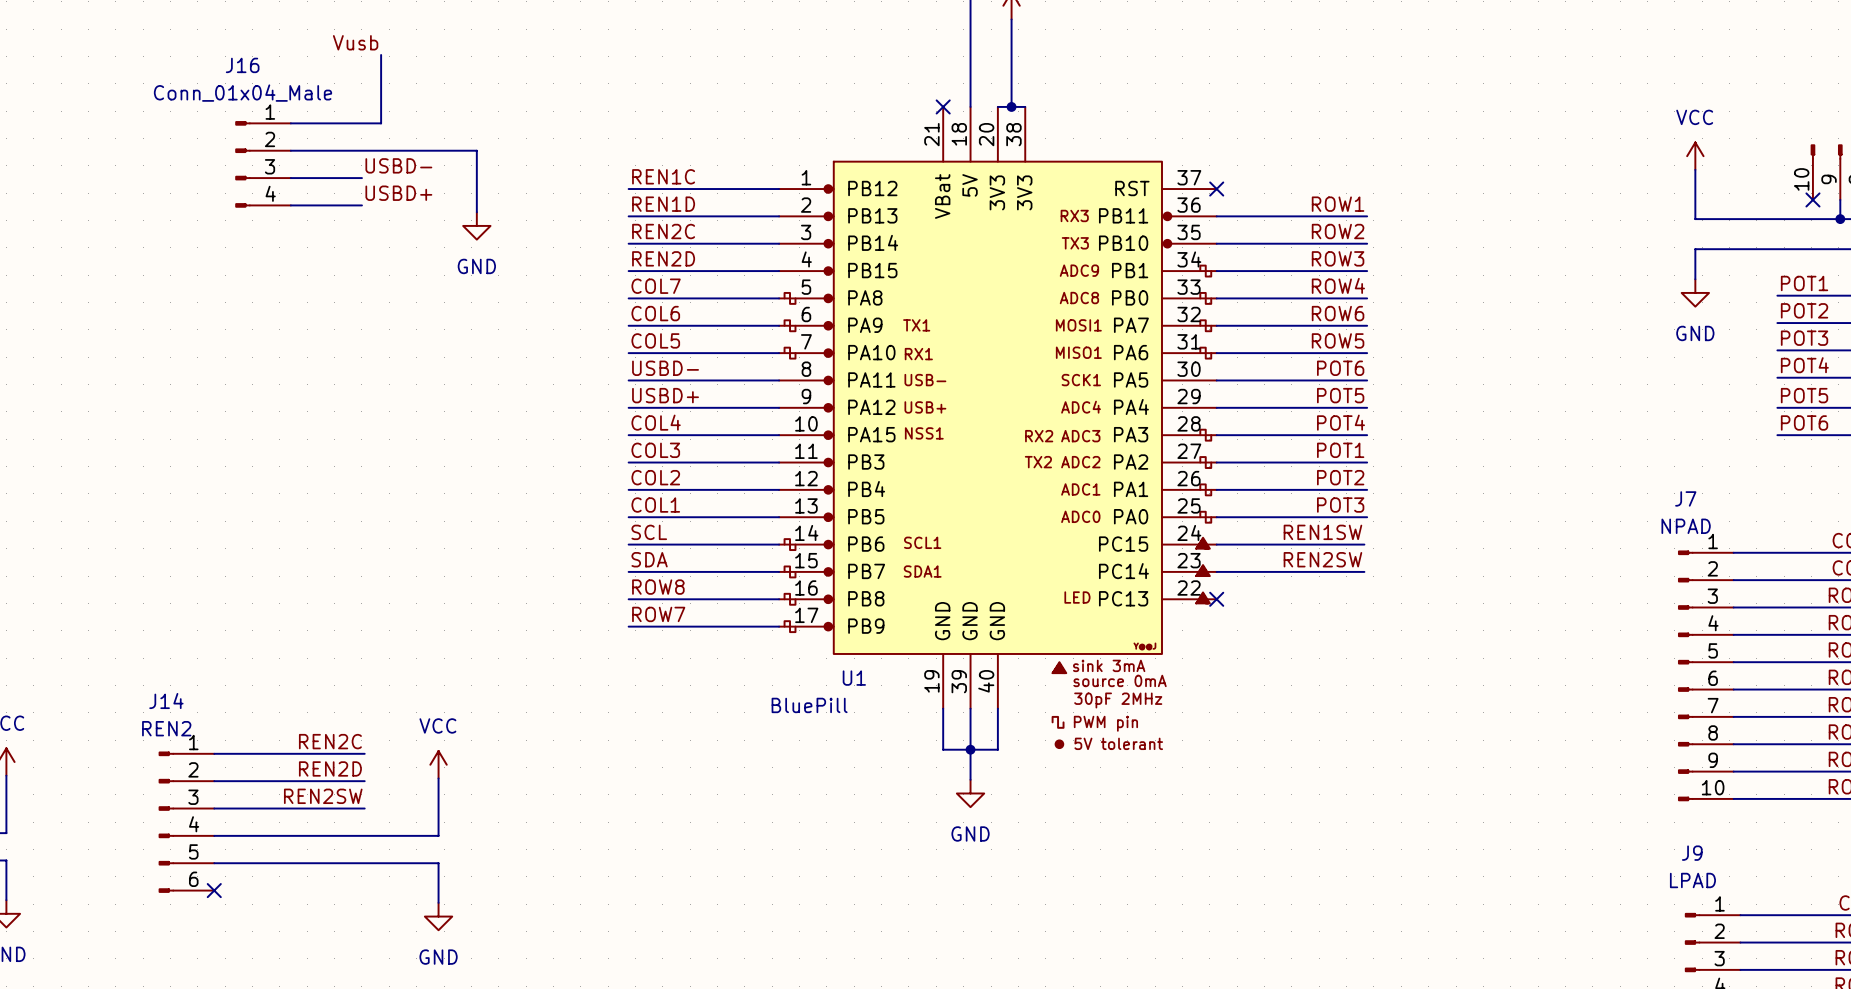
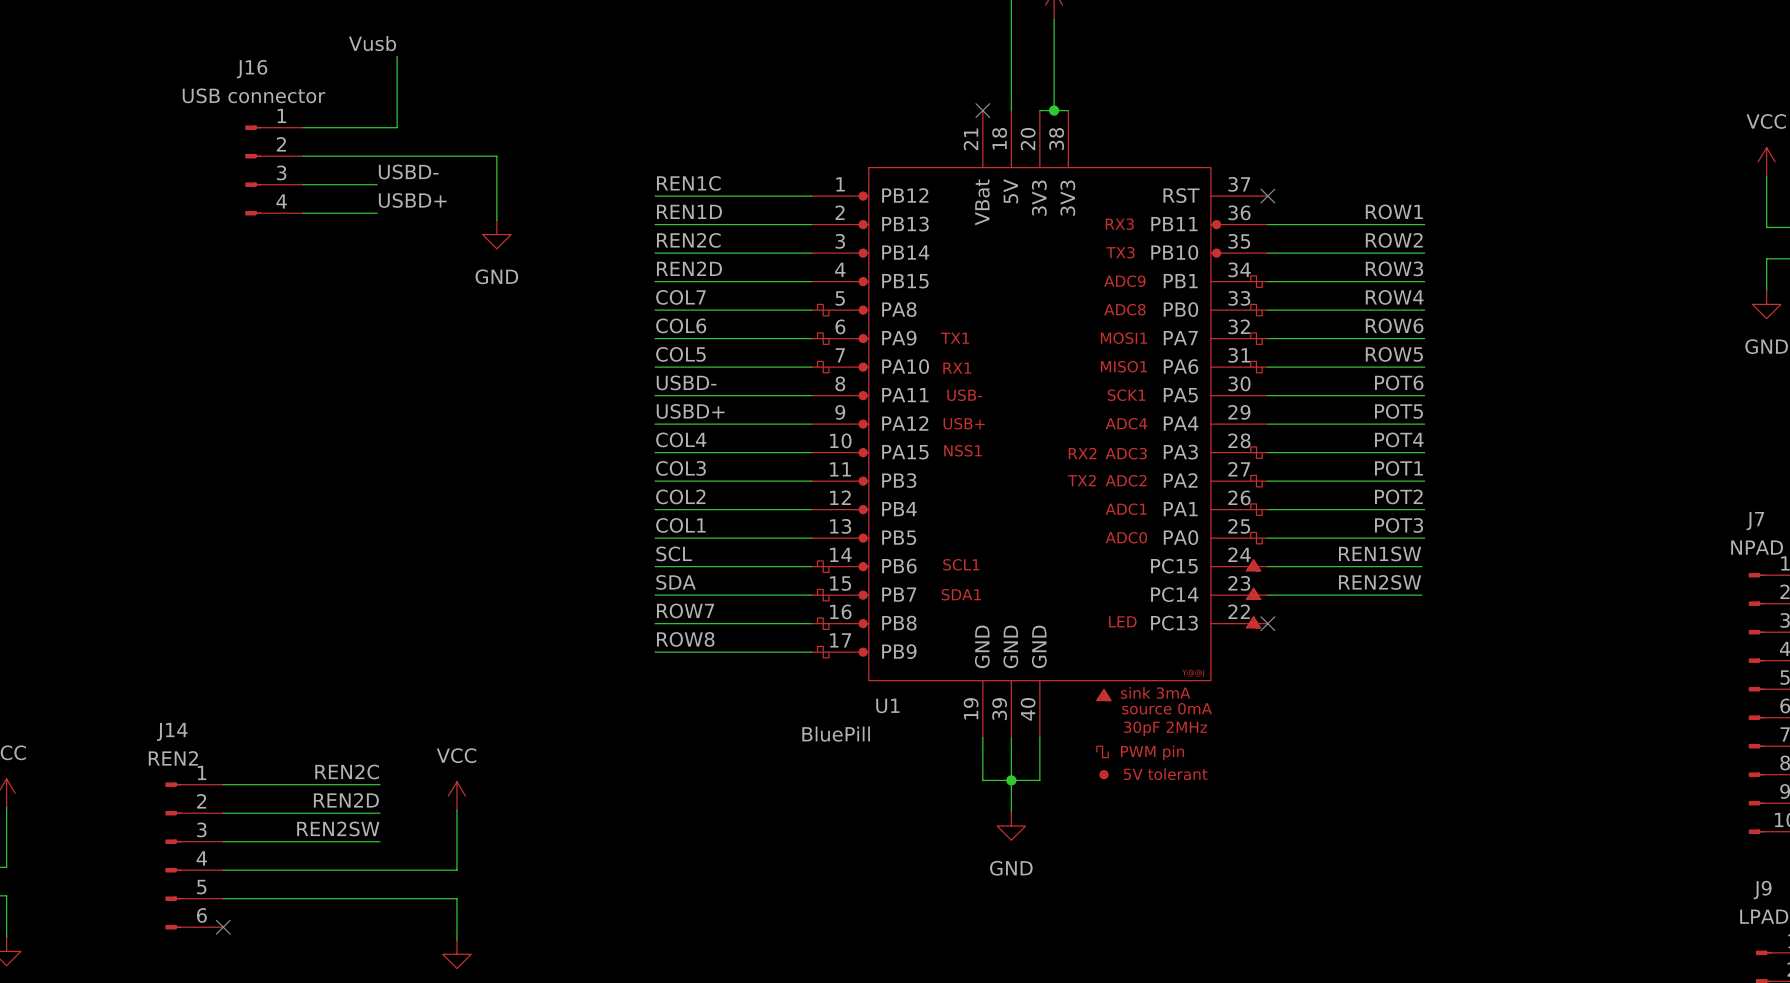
J16 value: Conn_01x04_Male (242, 93) -> USB connector (254, 95)
label: ROW8 (658, 587) -> ROW7 (685, 610)
label: ROW7 (658, 614) -> ROW8 (685, 639)

